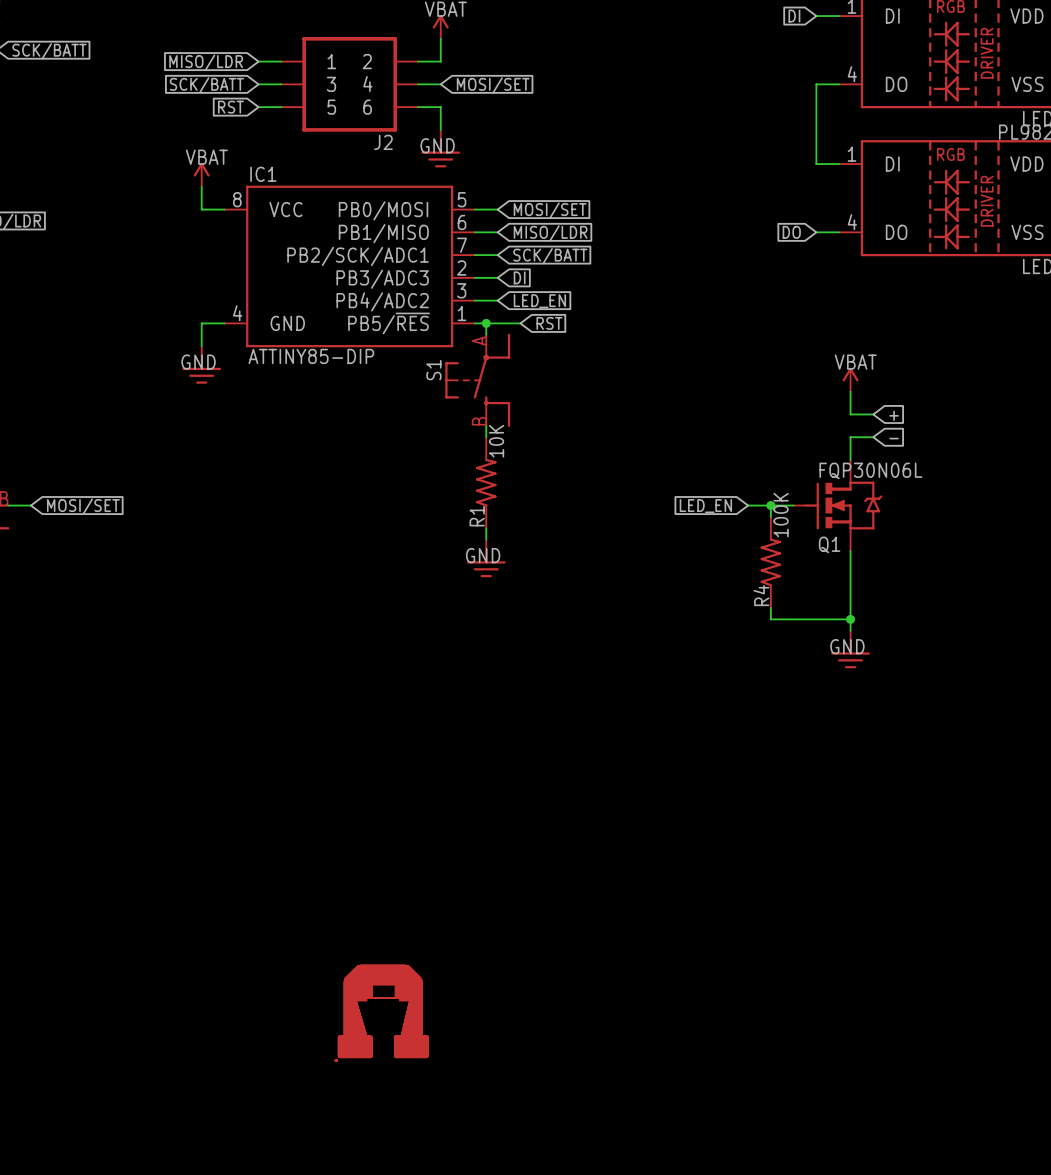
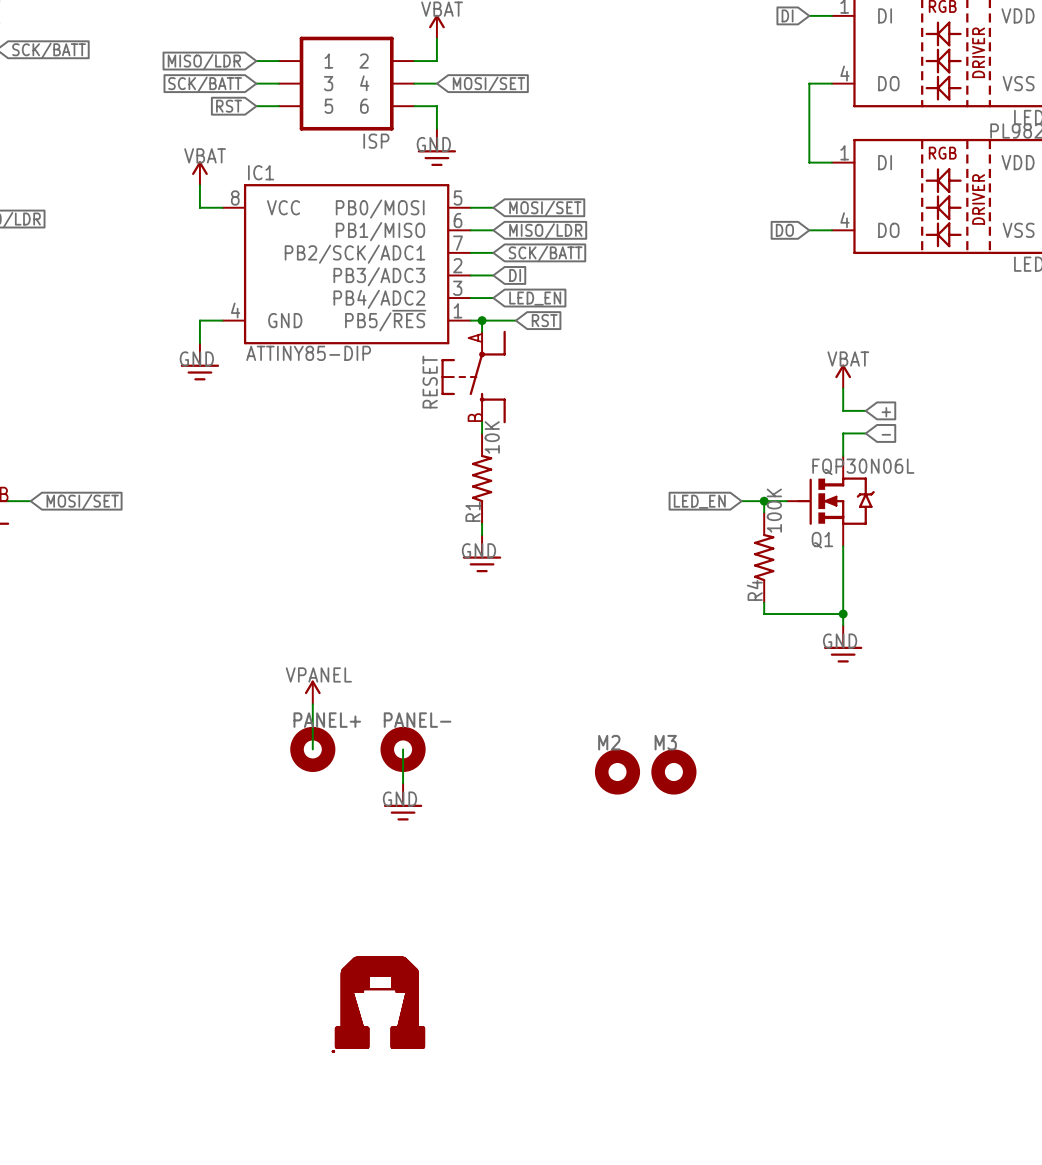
J2 name: J2 (383, 142) -> ISP (376, 141)
S1 name: S1 (433, 370) -> RESET (430, 382)
power symbol: none -> (312, 692)
wire: none -> (312, 704) (312, 749)
PANEL+: none -> (312, 749)
wire: none -> (403, 749) (403, 783)
PANEL-: none -> (403, 749)
M2: none -> (617, 772)
M3: none -> (673, 772)
power symbol: none -> GND (403, 801)

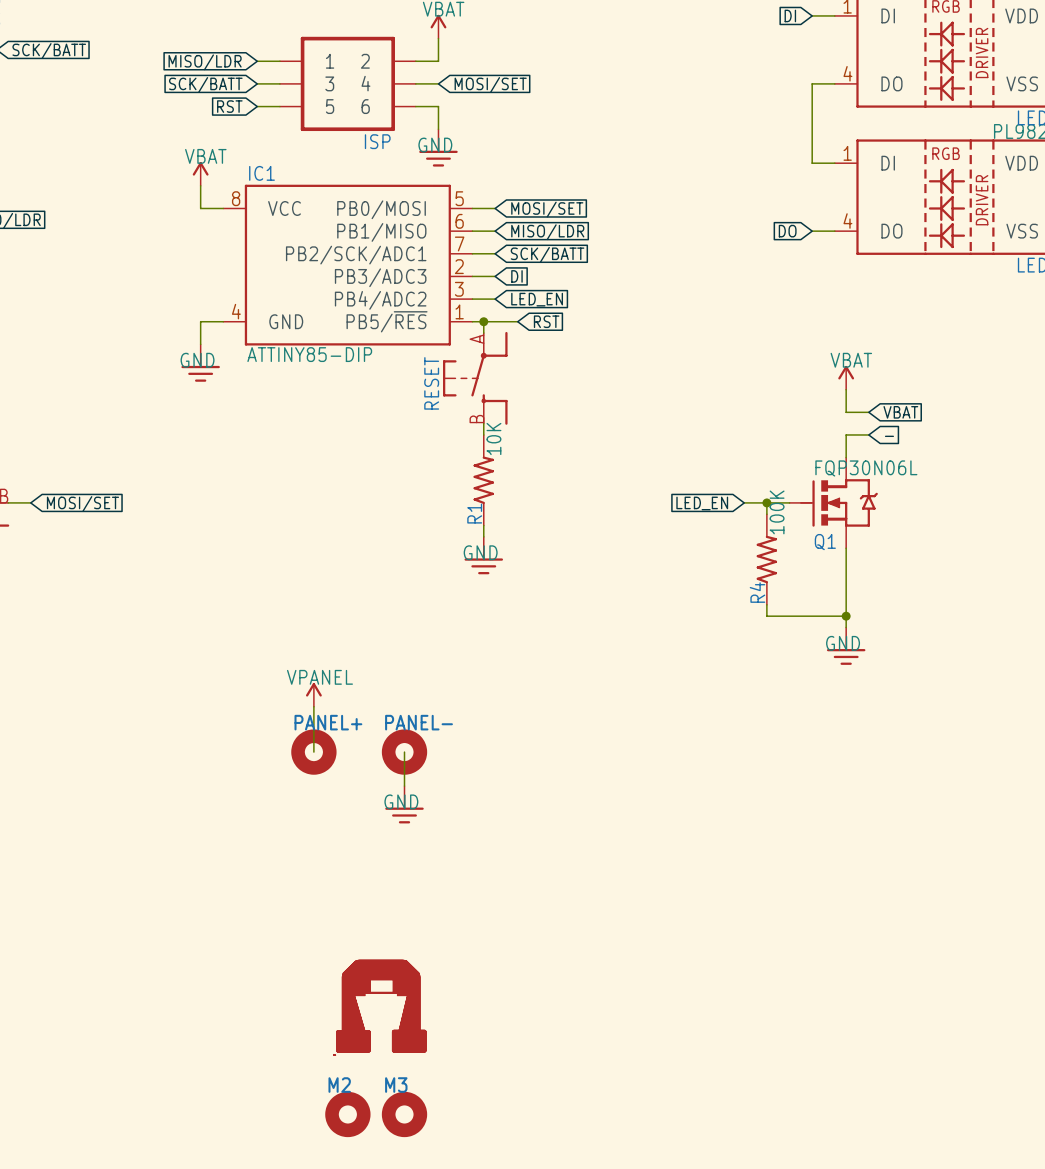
global label: + (886, 412) -> VBAT (900, 412)
M2 position: (617, 772) -> (347, 1114)
M3 position: (673, 772) -> (404, 1114)

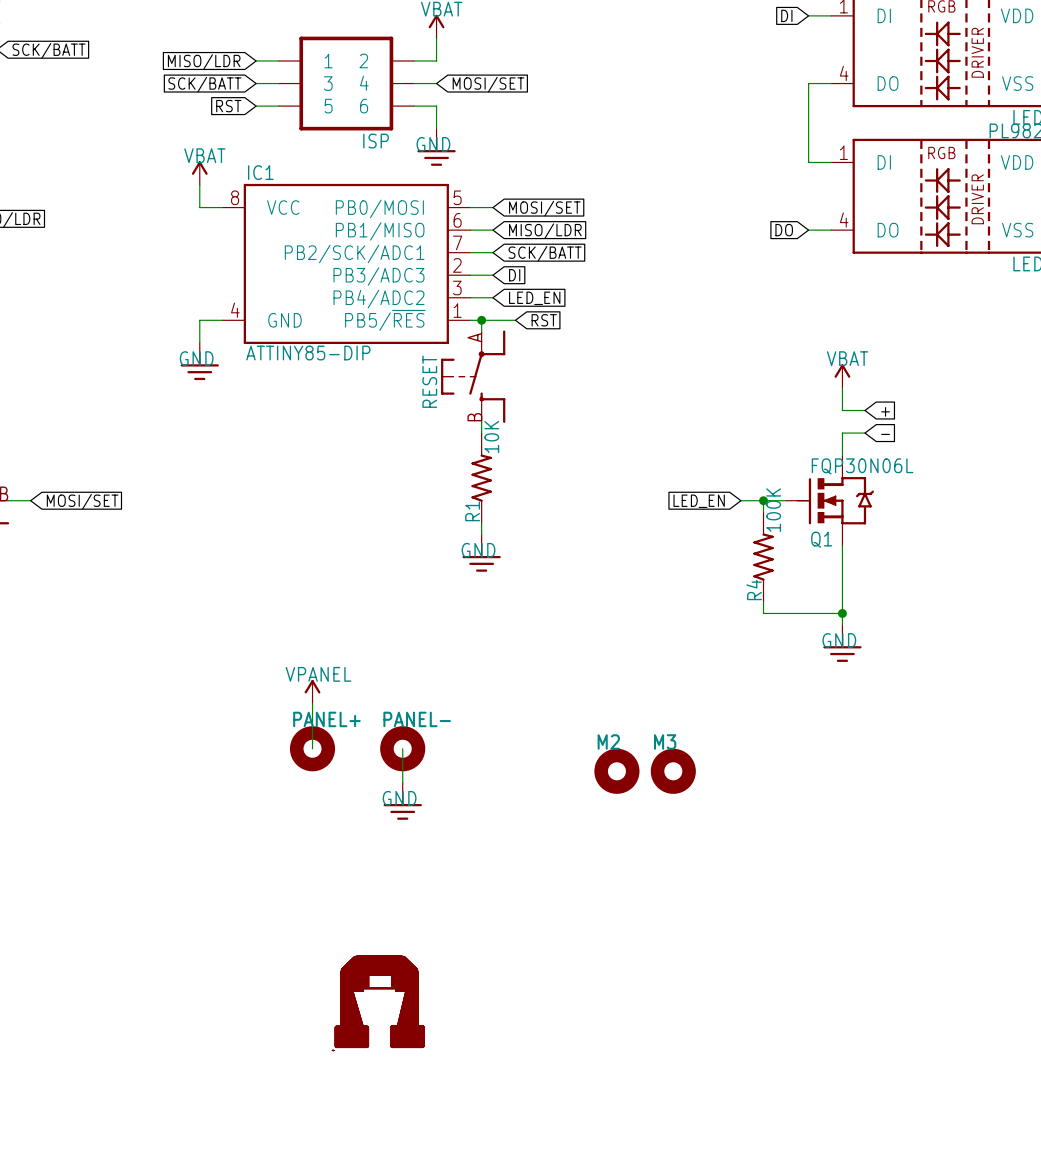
global label: VBAT (900, 412) -> + (885, 411)
M2 position: (347, 1114) -> (616, 771)
M3 position: (404, 1114) -> (673, 771)

